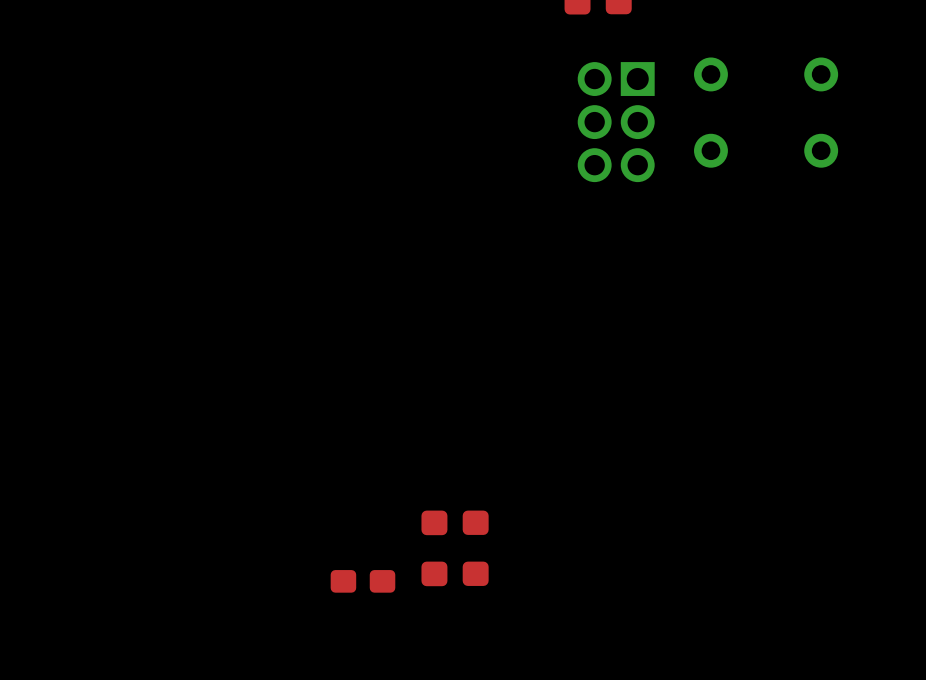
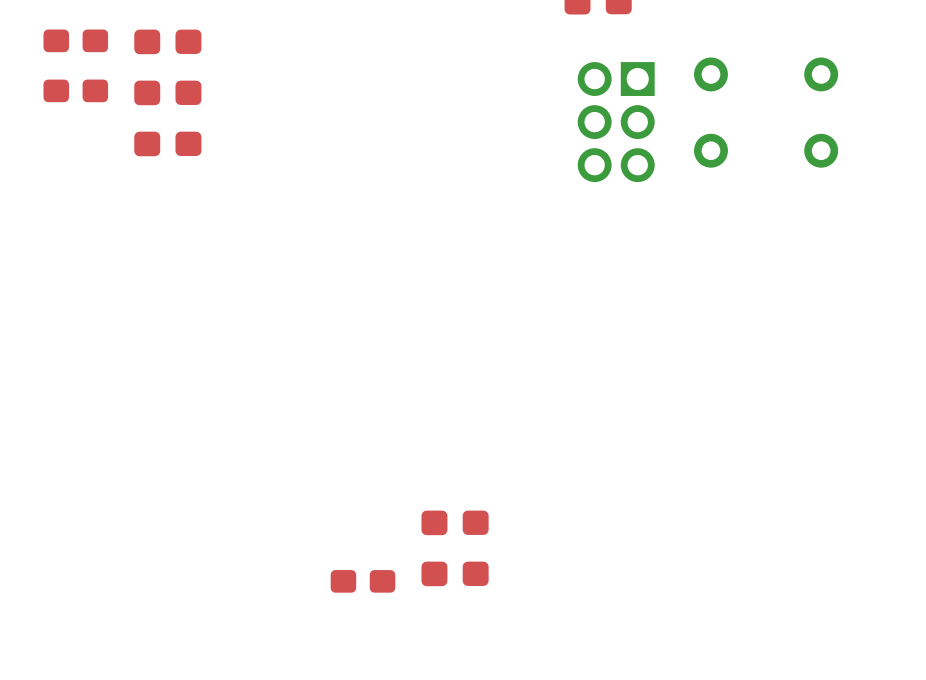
part: none -> (75, 40)
part: none -> (167, 41)
part: none -> (75, 90)
part: none -> (167, 92)
part: none -> (167, 143)

